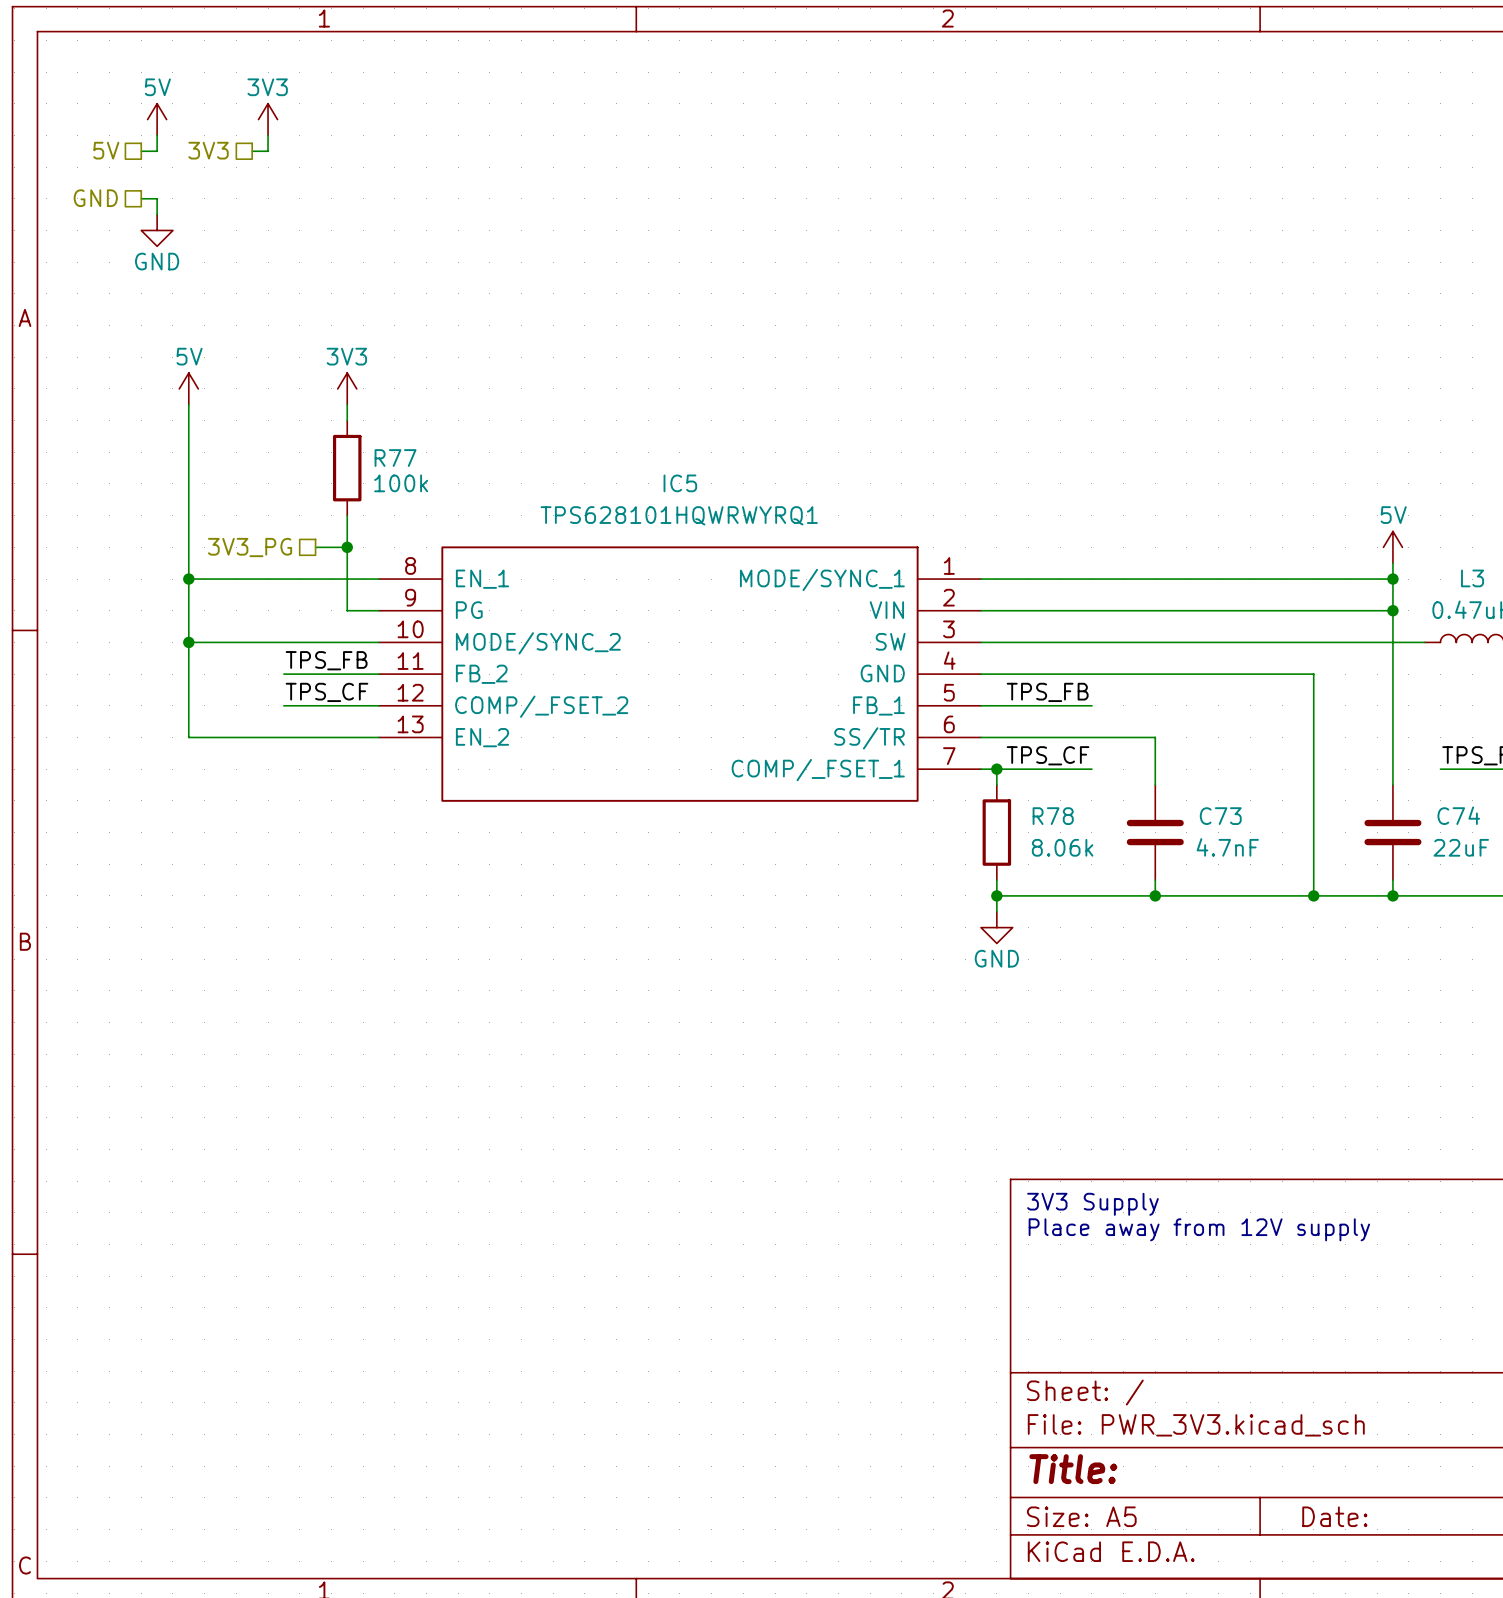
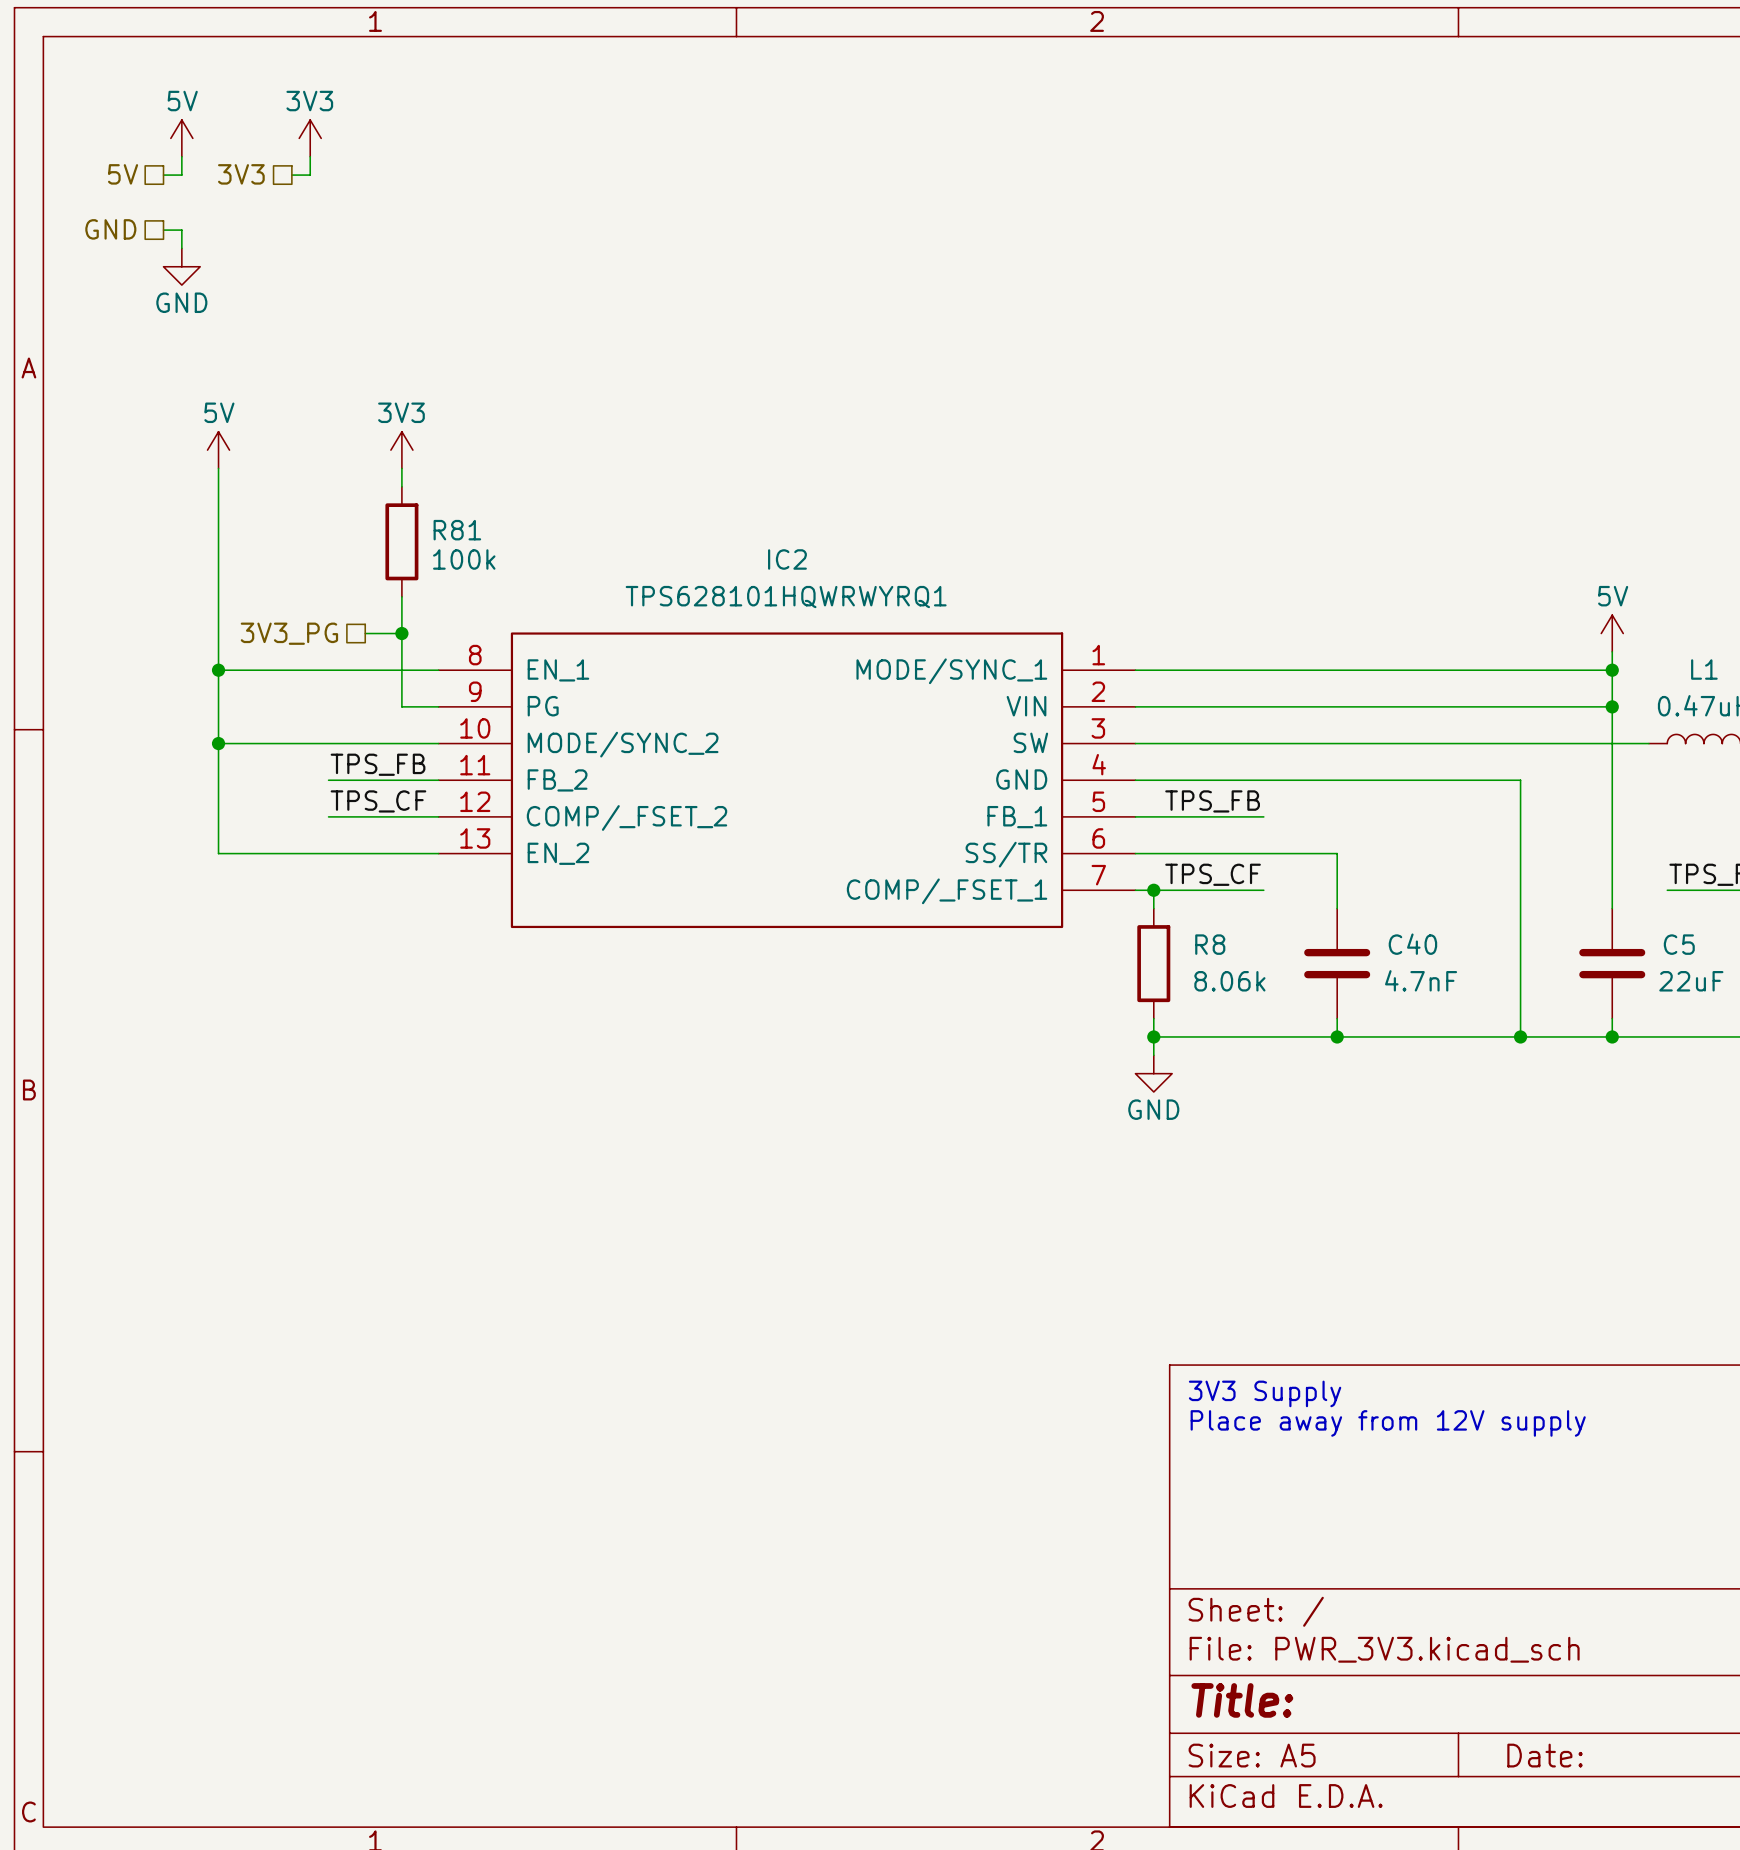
R77 name: R77 (395, 458) -> R81 (457, 530)
IC5 name: IC5 (680, 483) -> IC2 (787, 559)
L3 name: L3 (1472, 578) -> L1 (1704, 669)
C74 name: C74 (1458, 815) -> C5 (1679, 944)
R78 name: R78 (1053, 816) -> R8 (1210, 944)
C73 name: C73 (1220, 816) -> C40 (1412, 944)

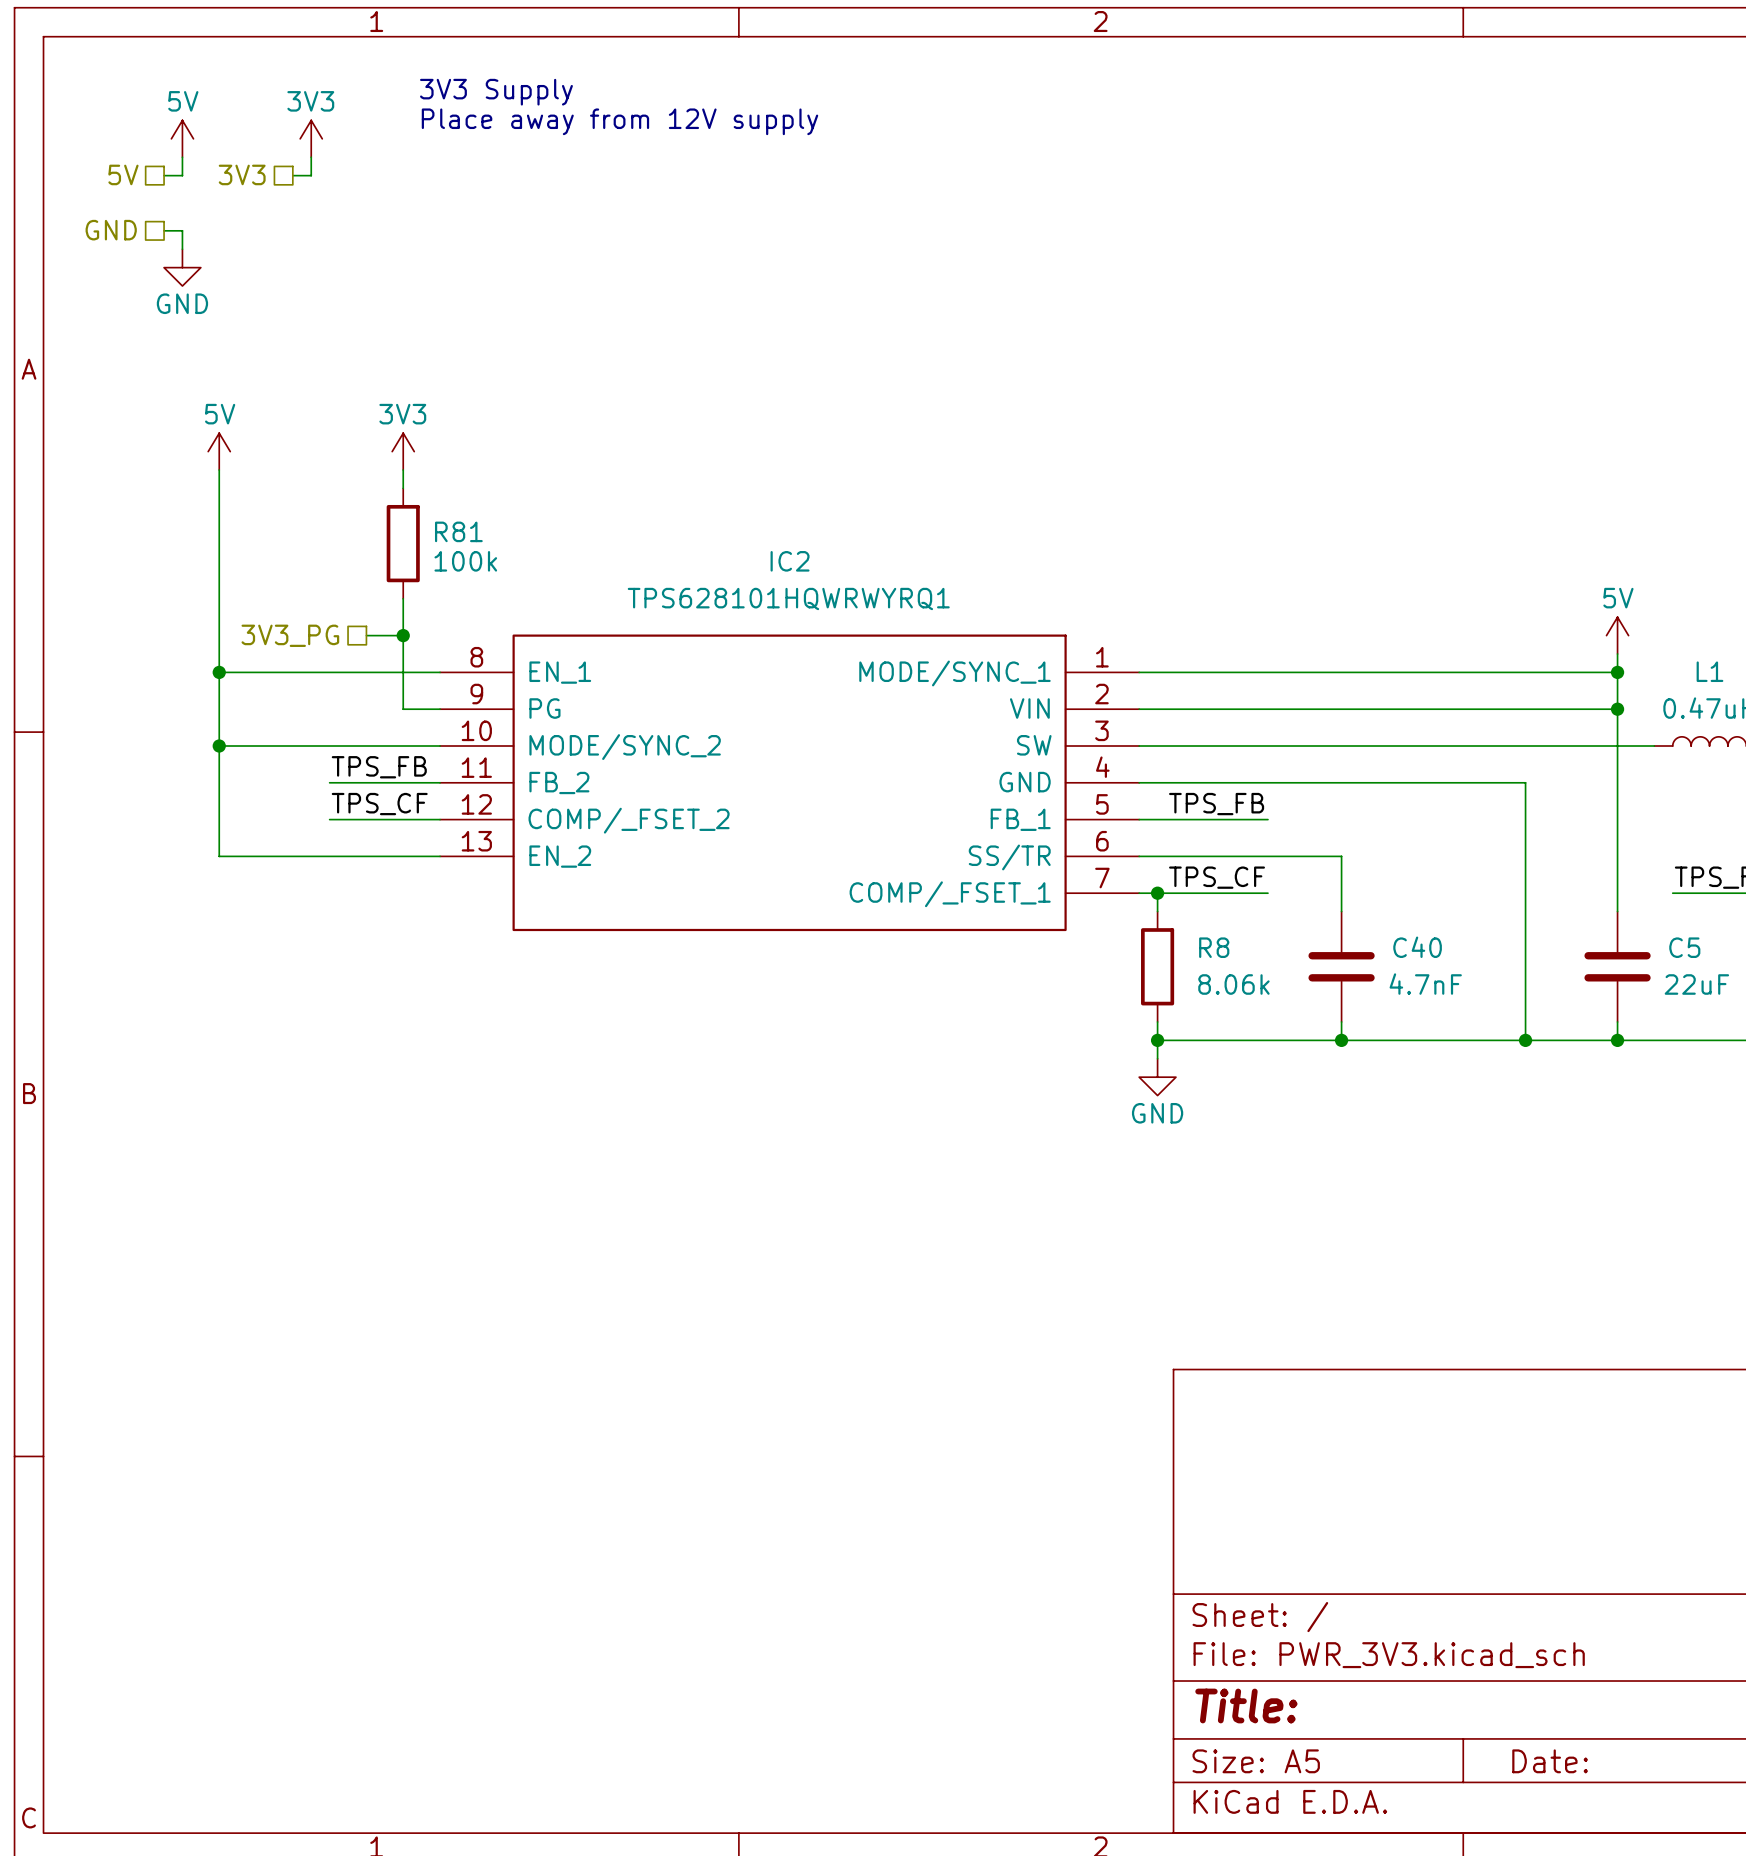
text: none -> 3V3 Supply (496, 92)
text: none -> Place away from 12V supply (619, 121)
text: 3V3 Supply (1265, 1393) -> none
text: Place away from 12V supply (1388, 1423) -> none

